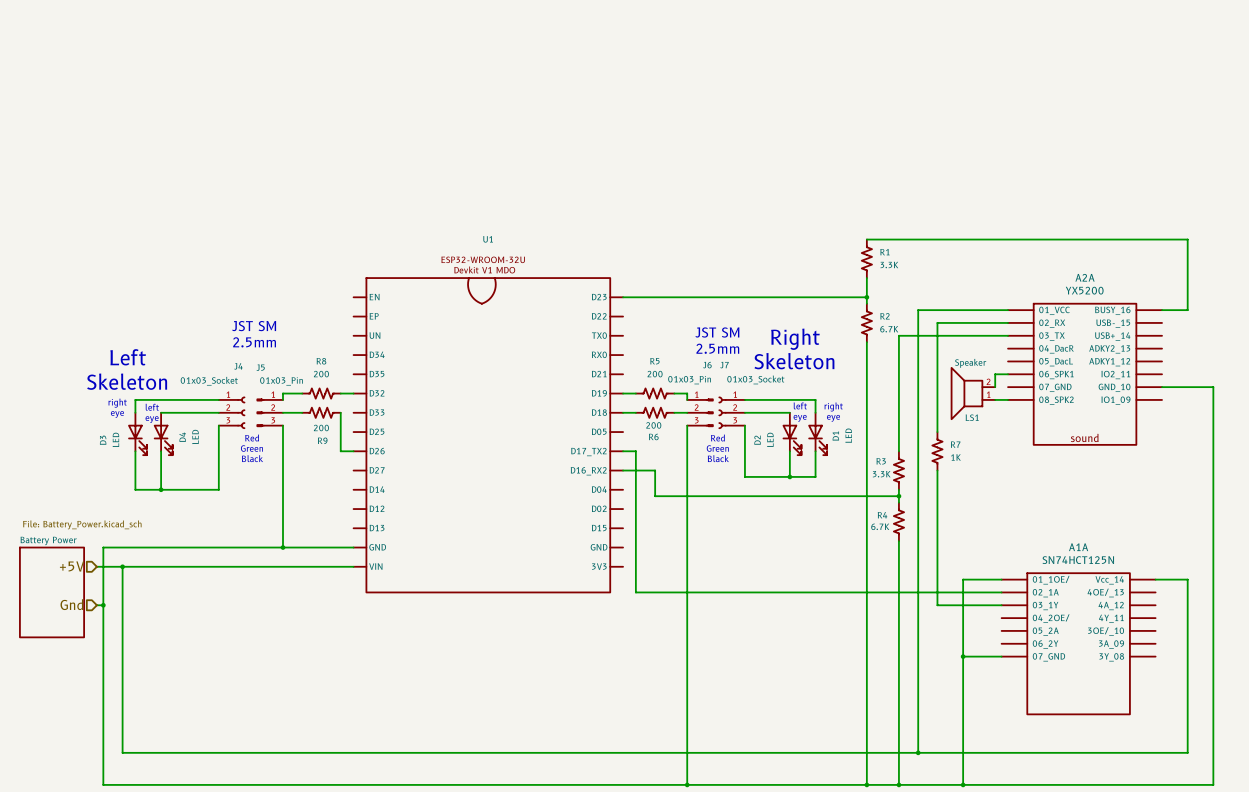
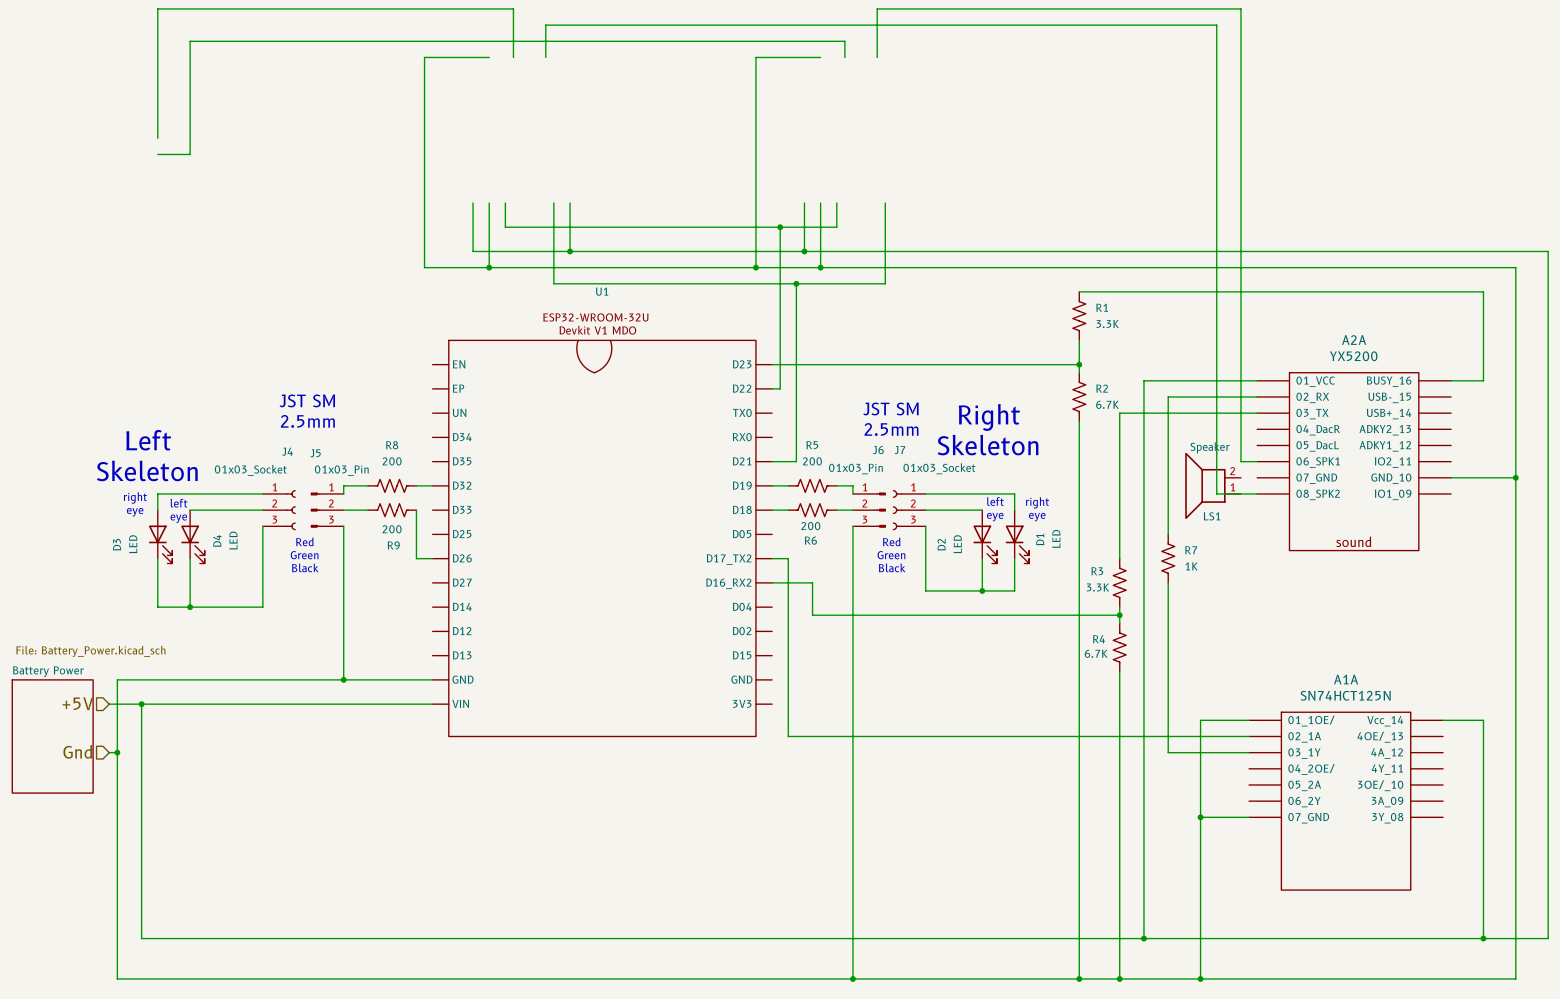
wire: none -> (489, 57) (424, 57) (424, 267) (1515, 267) (1515, 477)
wire: none -> (513, 57) (513, 8) (157, 8) (157, 138)
wire: none -> (545, 57) (545, 25) (1216, 25) (1216, 493) (1240, 493)
wire: none -> (820, 57) (755, 57) (755, 267)
wire: none -> (844, 57) (844, 41) (190, 41) (190, 154) (157, 154)
wire: none -> (473, 202) (473, 251) (1548, 251) (1548, 938) (1483, 938)
wire: none -> (489, 202) (489, 267)
wire: none -> (505, 202) (505, 227) (836, 227) (836, 202)
wire: none -> (553, 202) (553, 283) (885, 283) (885, 202)
wire: none -> (570, 202) (570, 251)
wire: none -> (804, 202) (804, 251)
wire: none -> (820, 202) (820, 267)
wire: none -> (780, 227) (780, 388) (772, 388)
junction: none -> (780, 227)
junction: none -> (570, 251)
junction: none -> (804, 251)
junction: none -> (489, 267)
junction: none -> (755, 267)
junction: none -> (820, 267)
wire: none -> (796, 283) (796, 461) (772, 461)
junction: none -> (796, 283)
wire: (995, 374) (995, 387) -> (1240, 461) (1240, 8) (877, 8) (877, 57)
junction: none -> (1515, 477)
junction: none -> (1483, 938)

